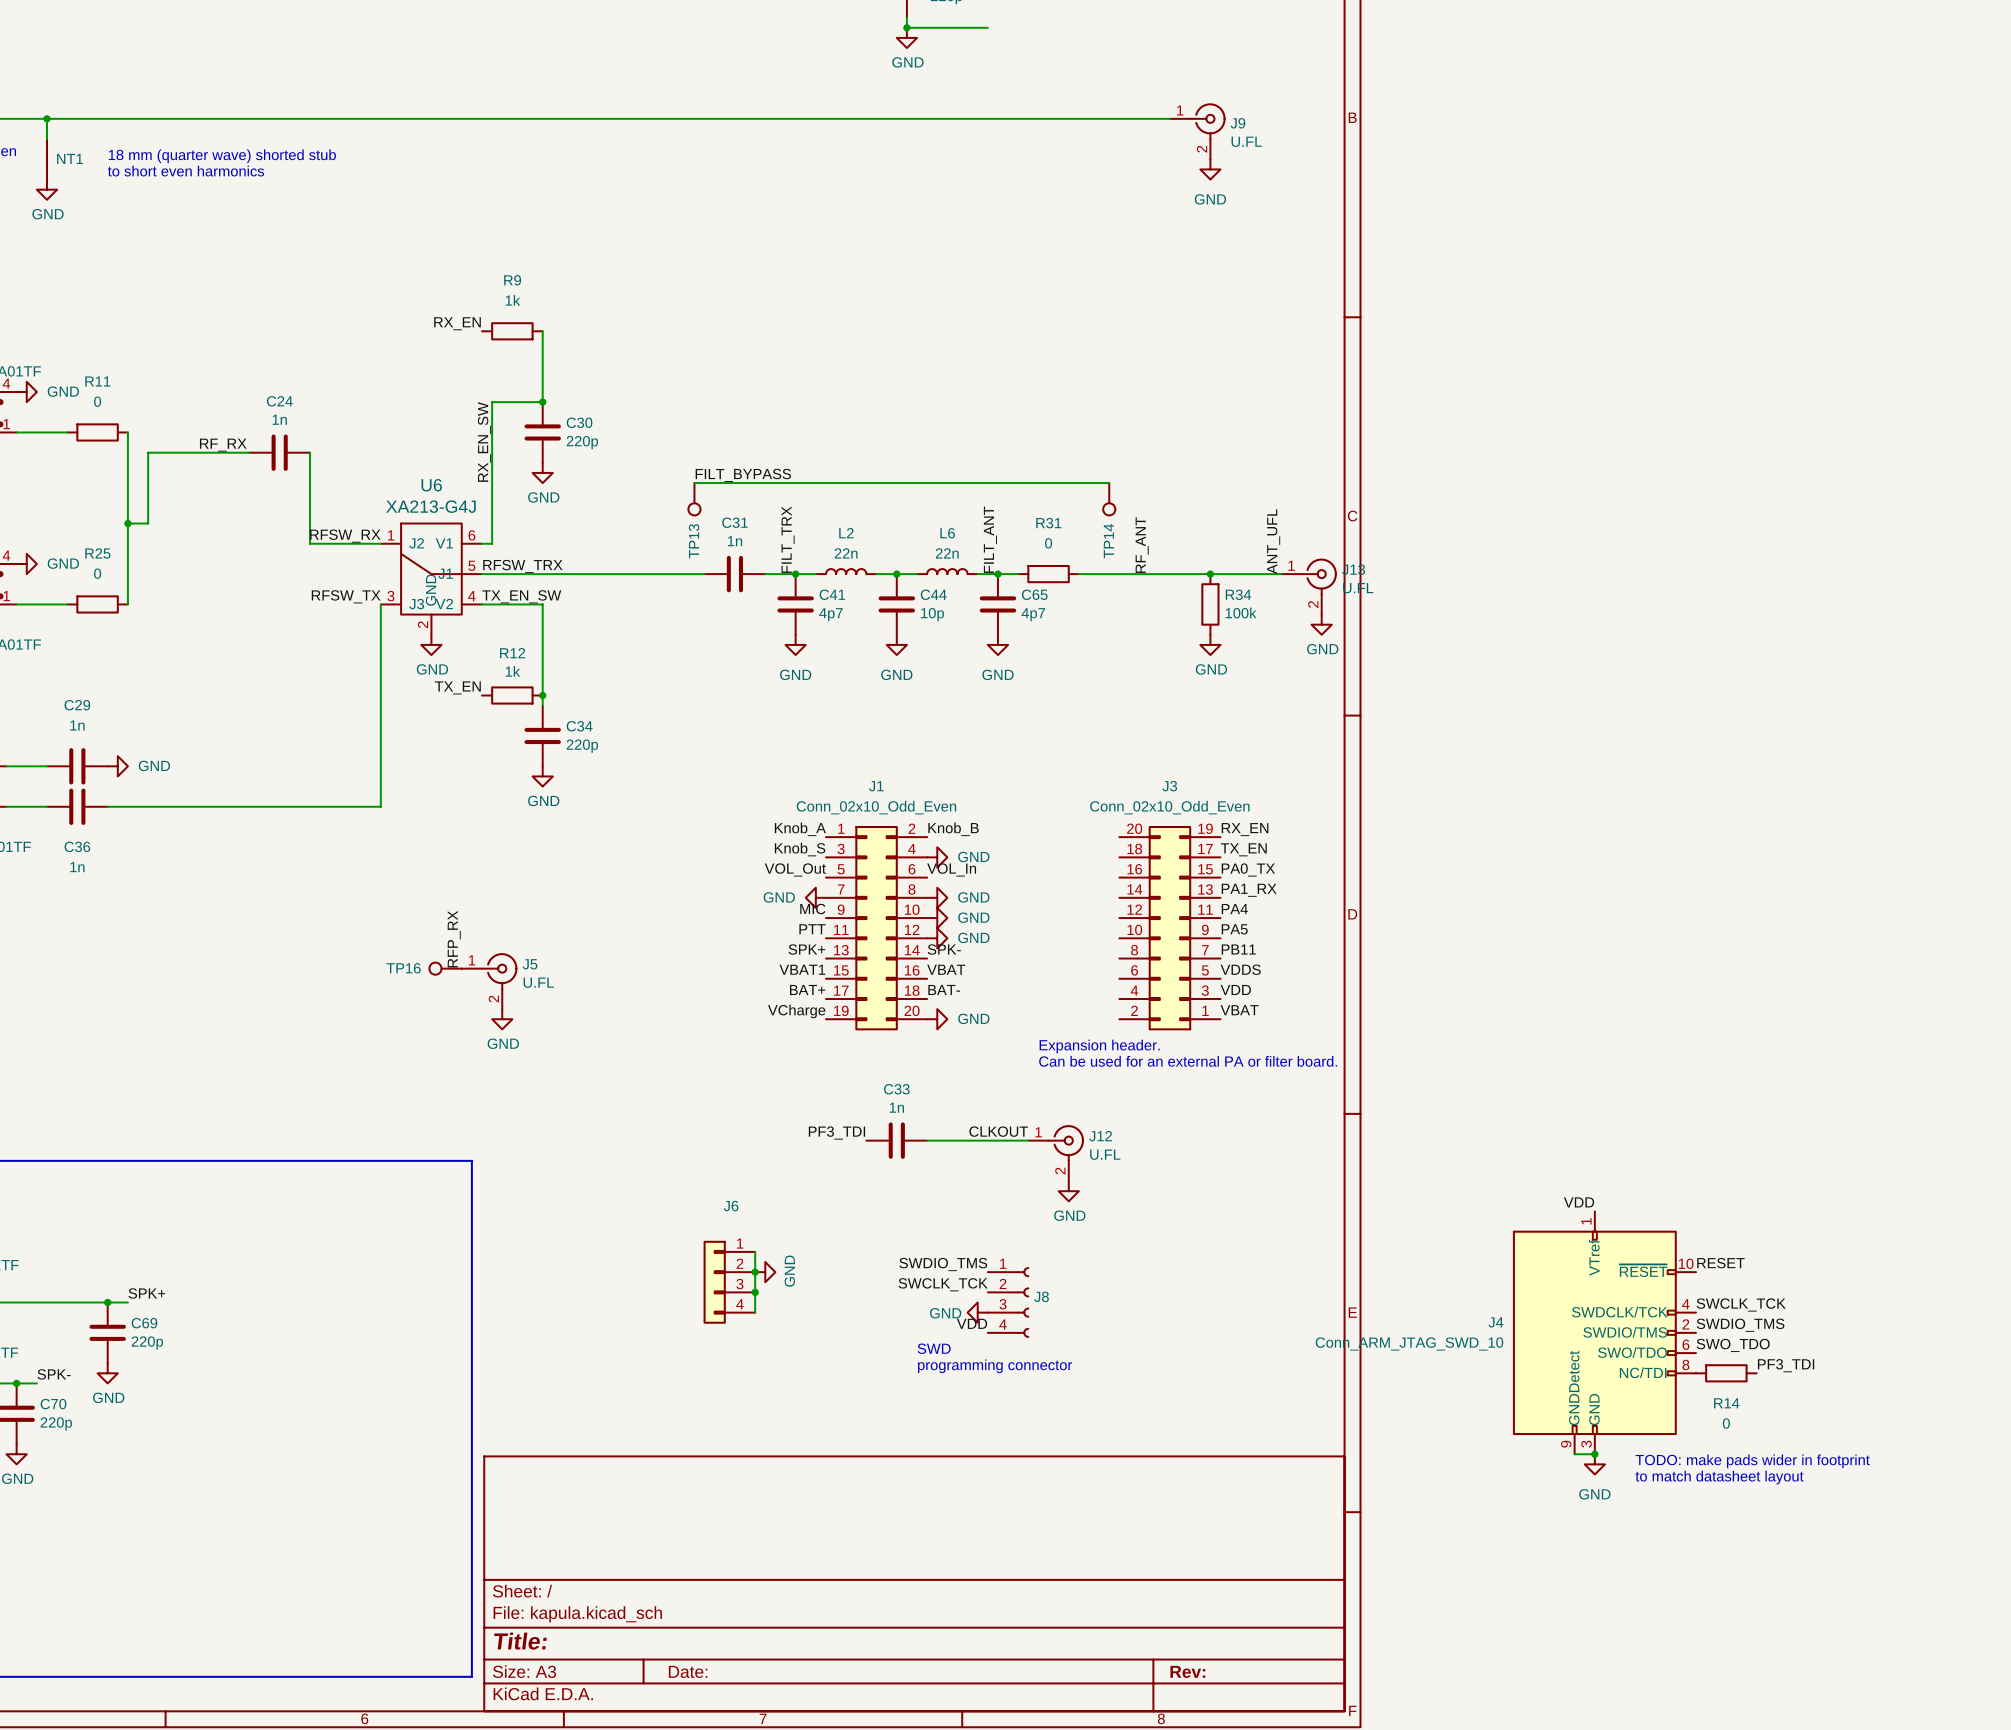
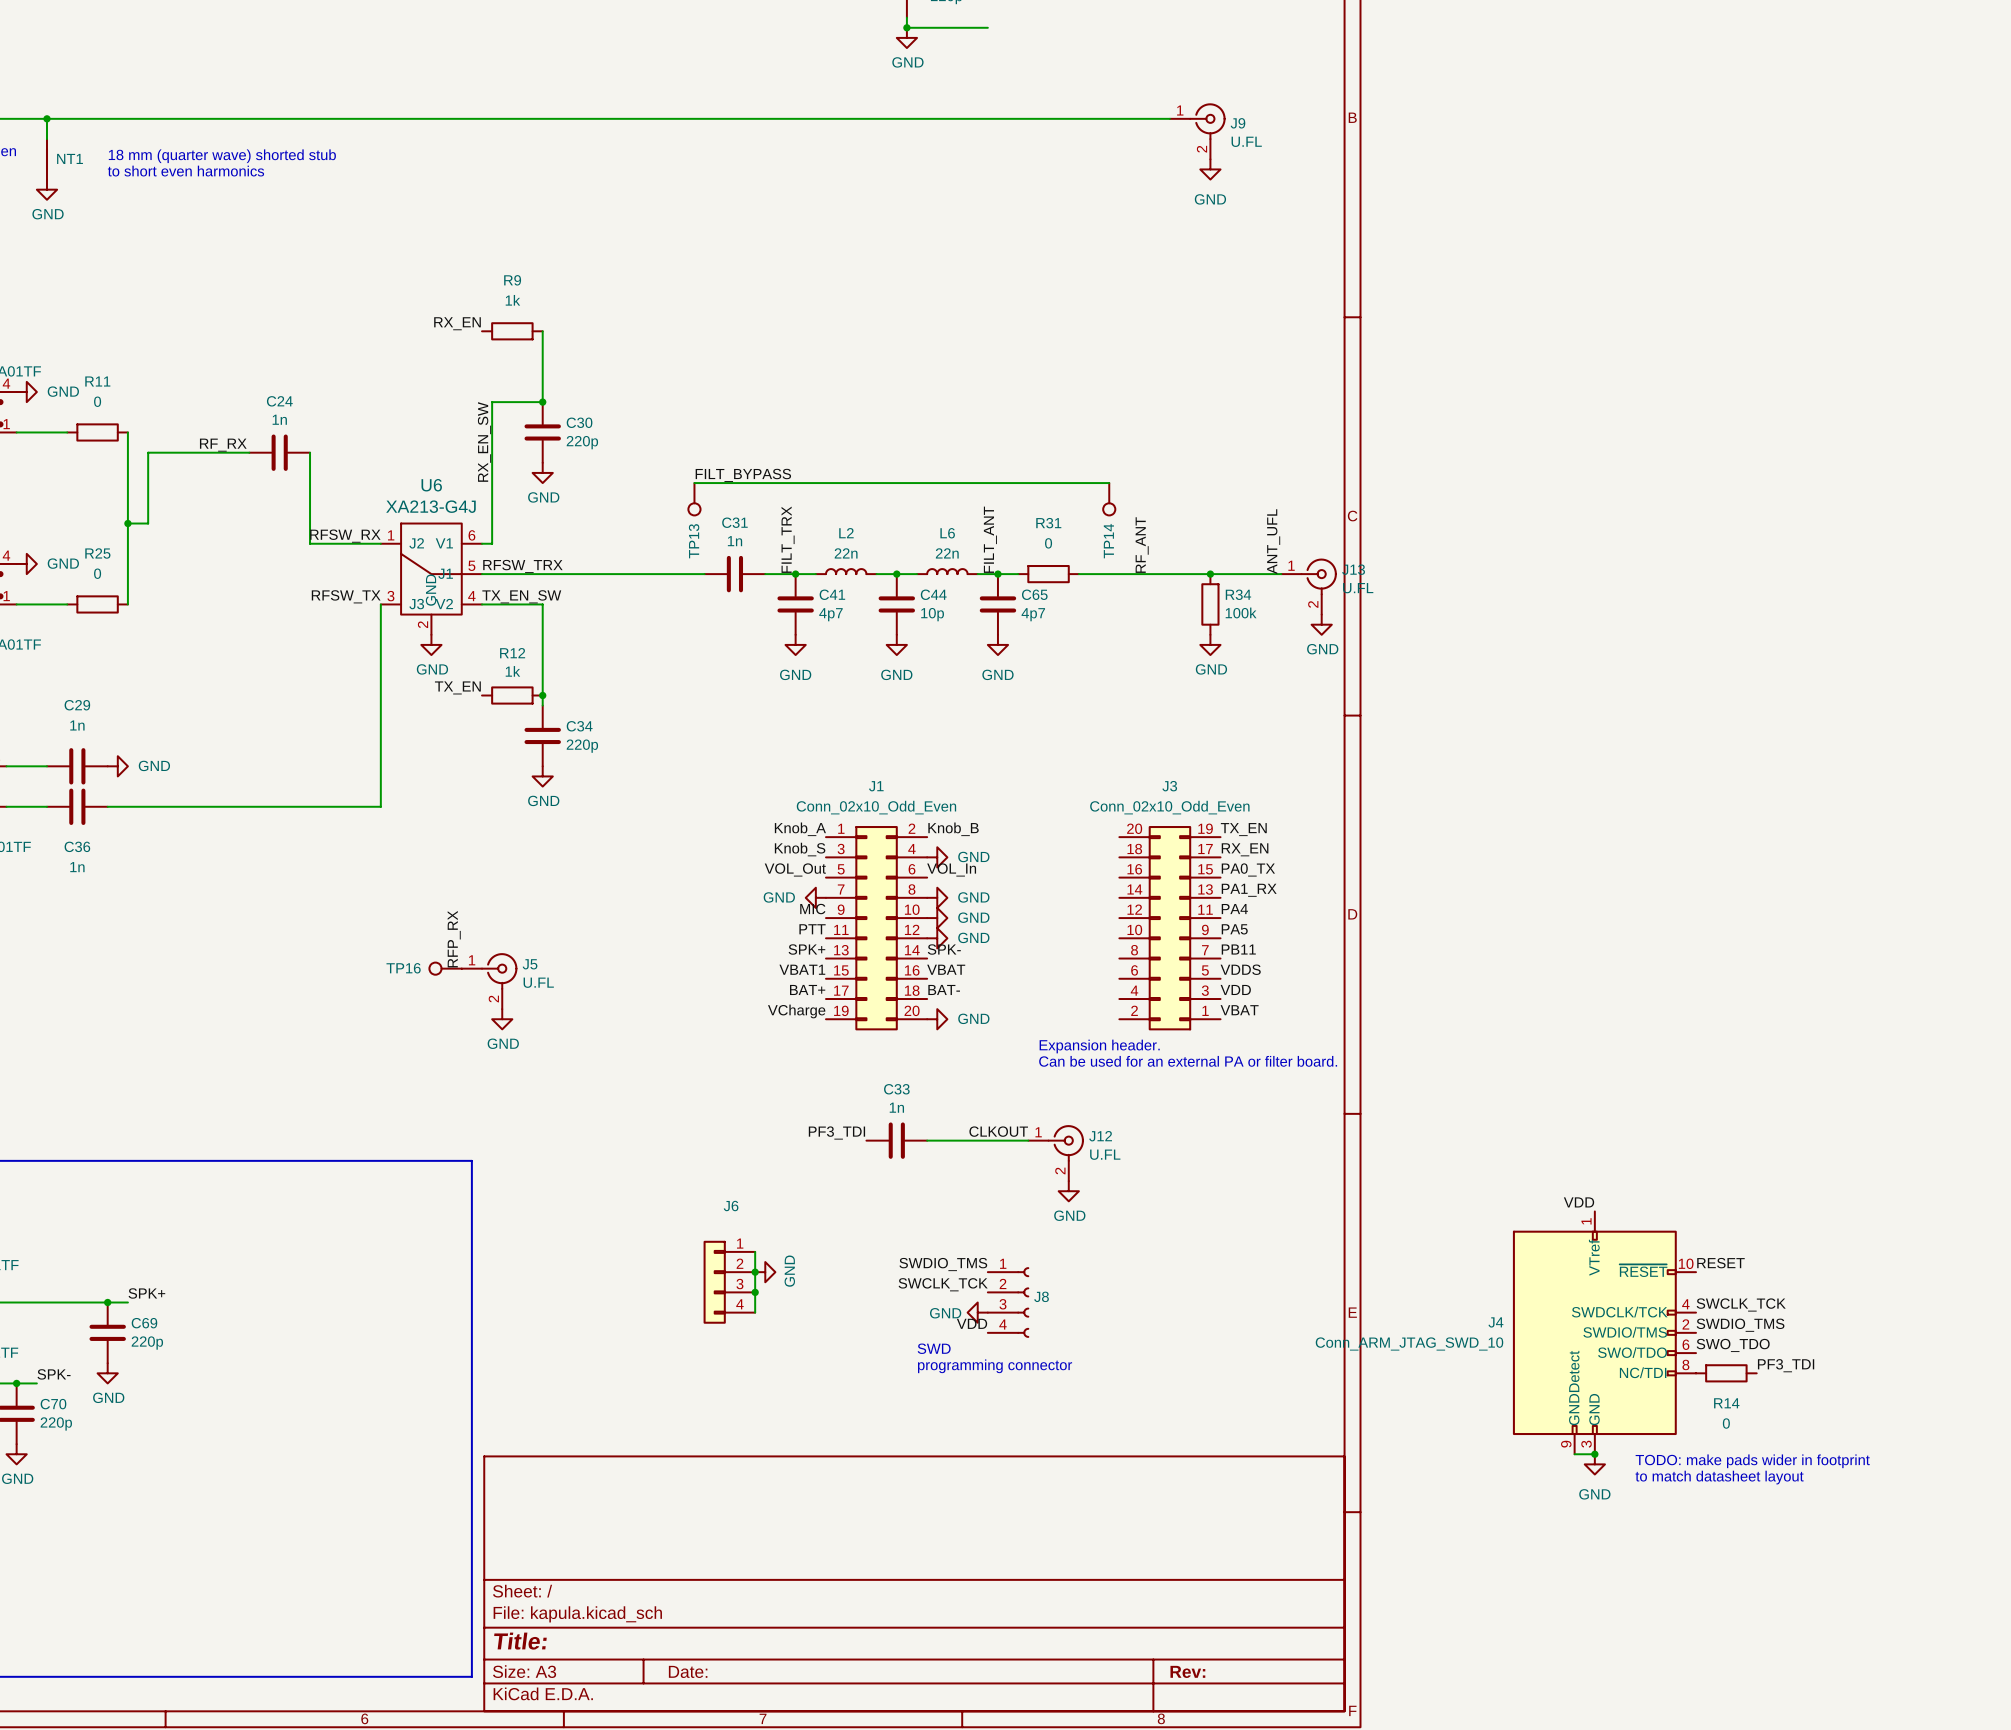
label: RX_EN (1245, 829) -> TX_EN (1243, 829)
label: TX_EN (1243, 849) -> RX_EN (1245, 849)

